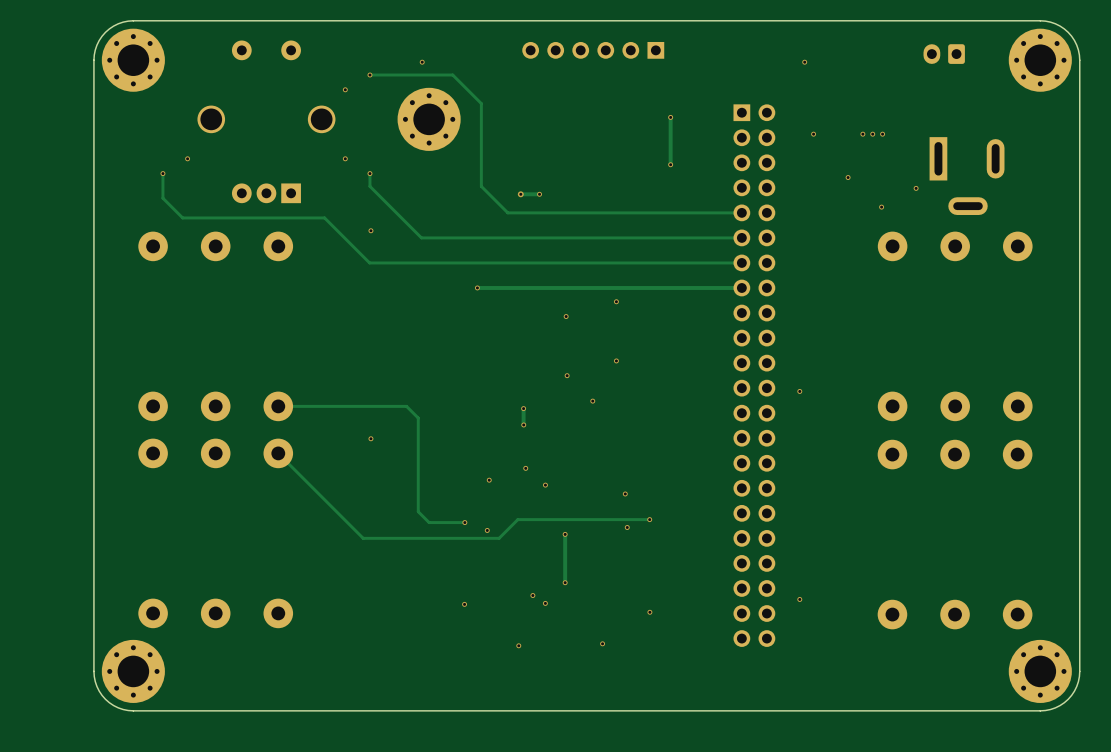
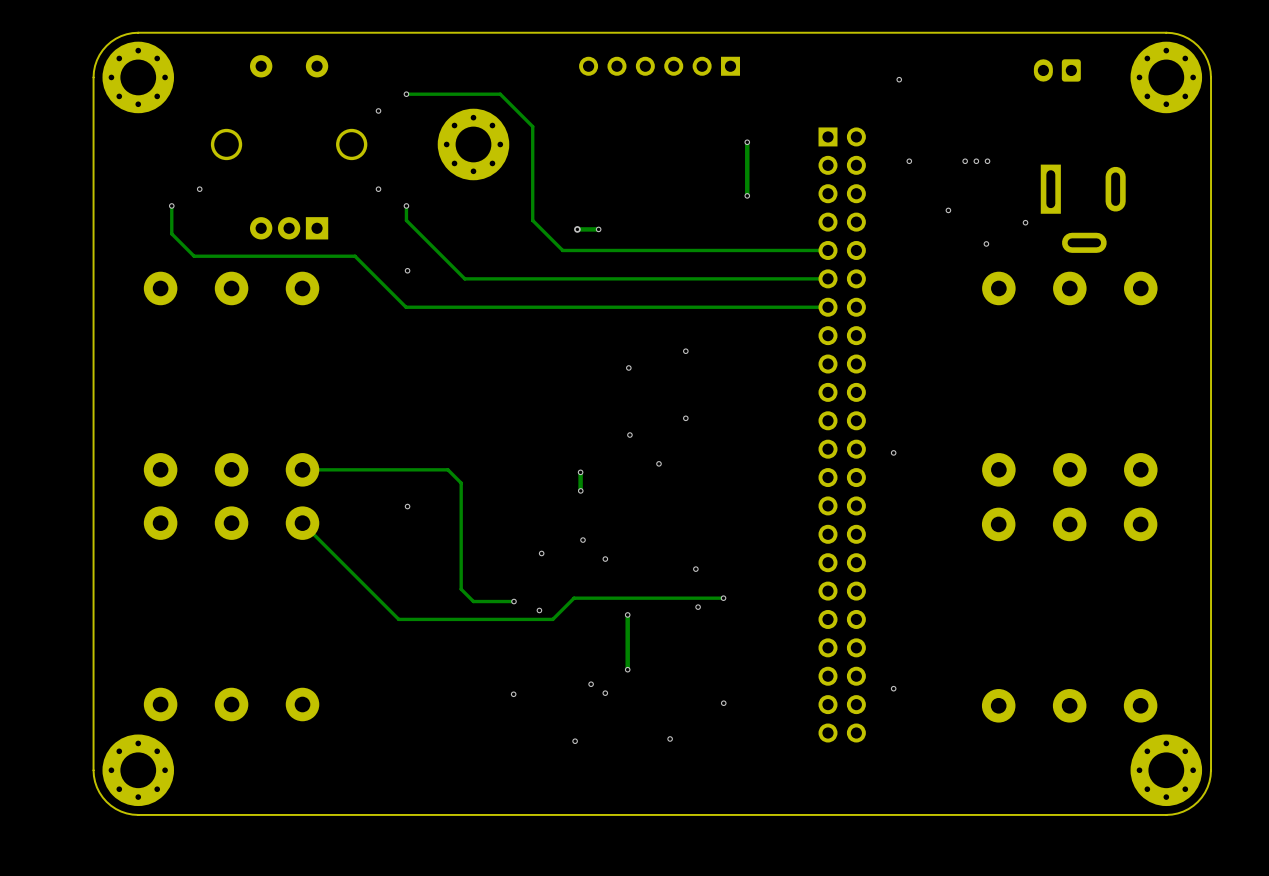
via: (422, 62) -> none
via: (477, 287) -> none
track: (741, 287) (477, 287) -> none

